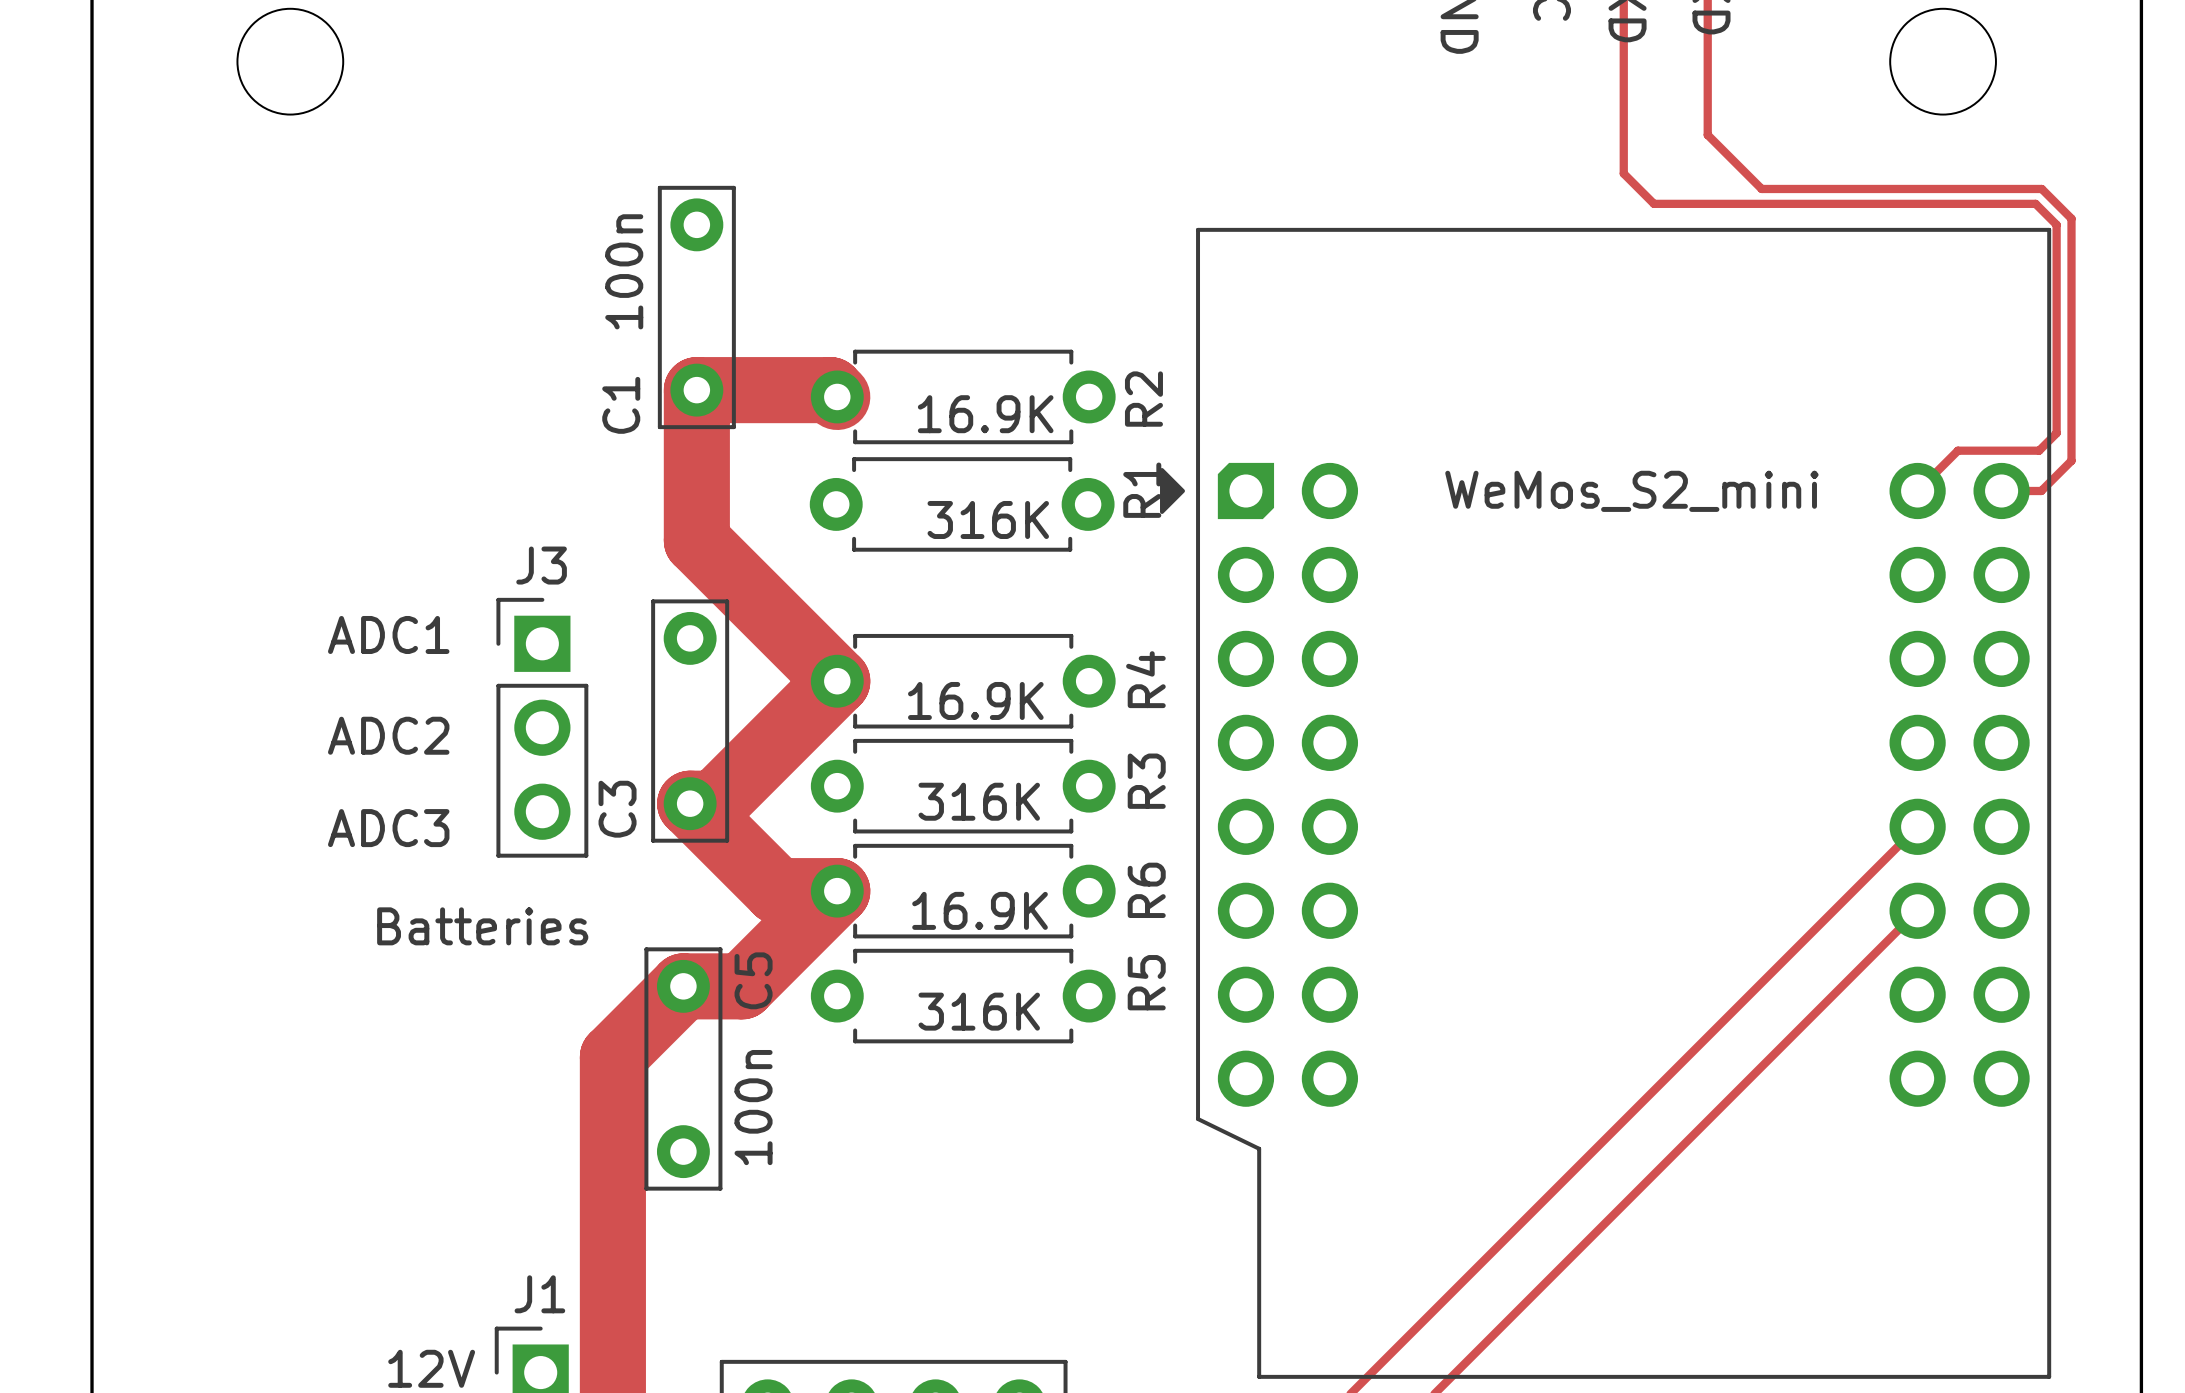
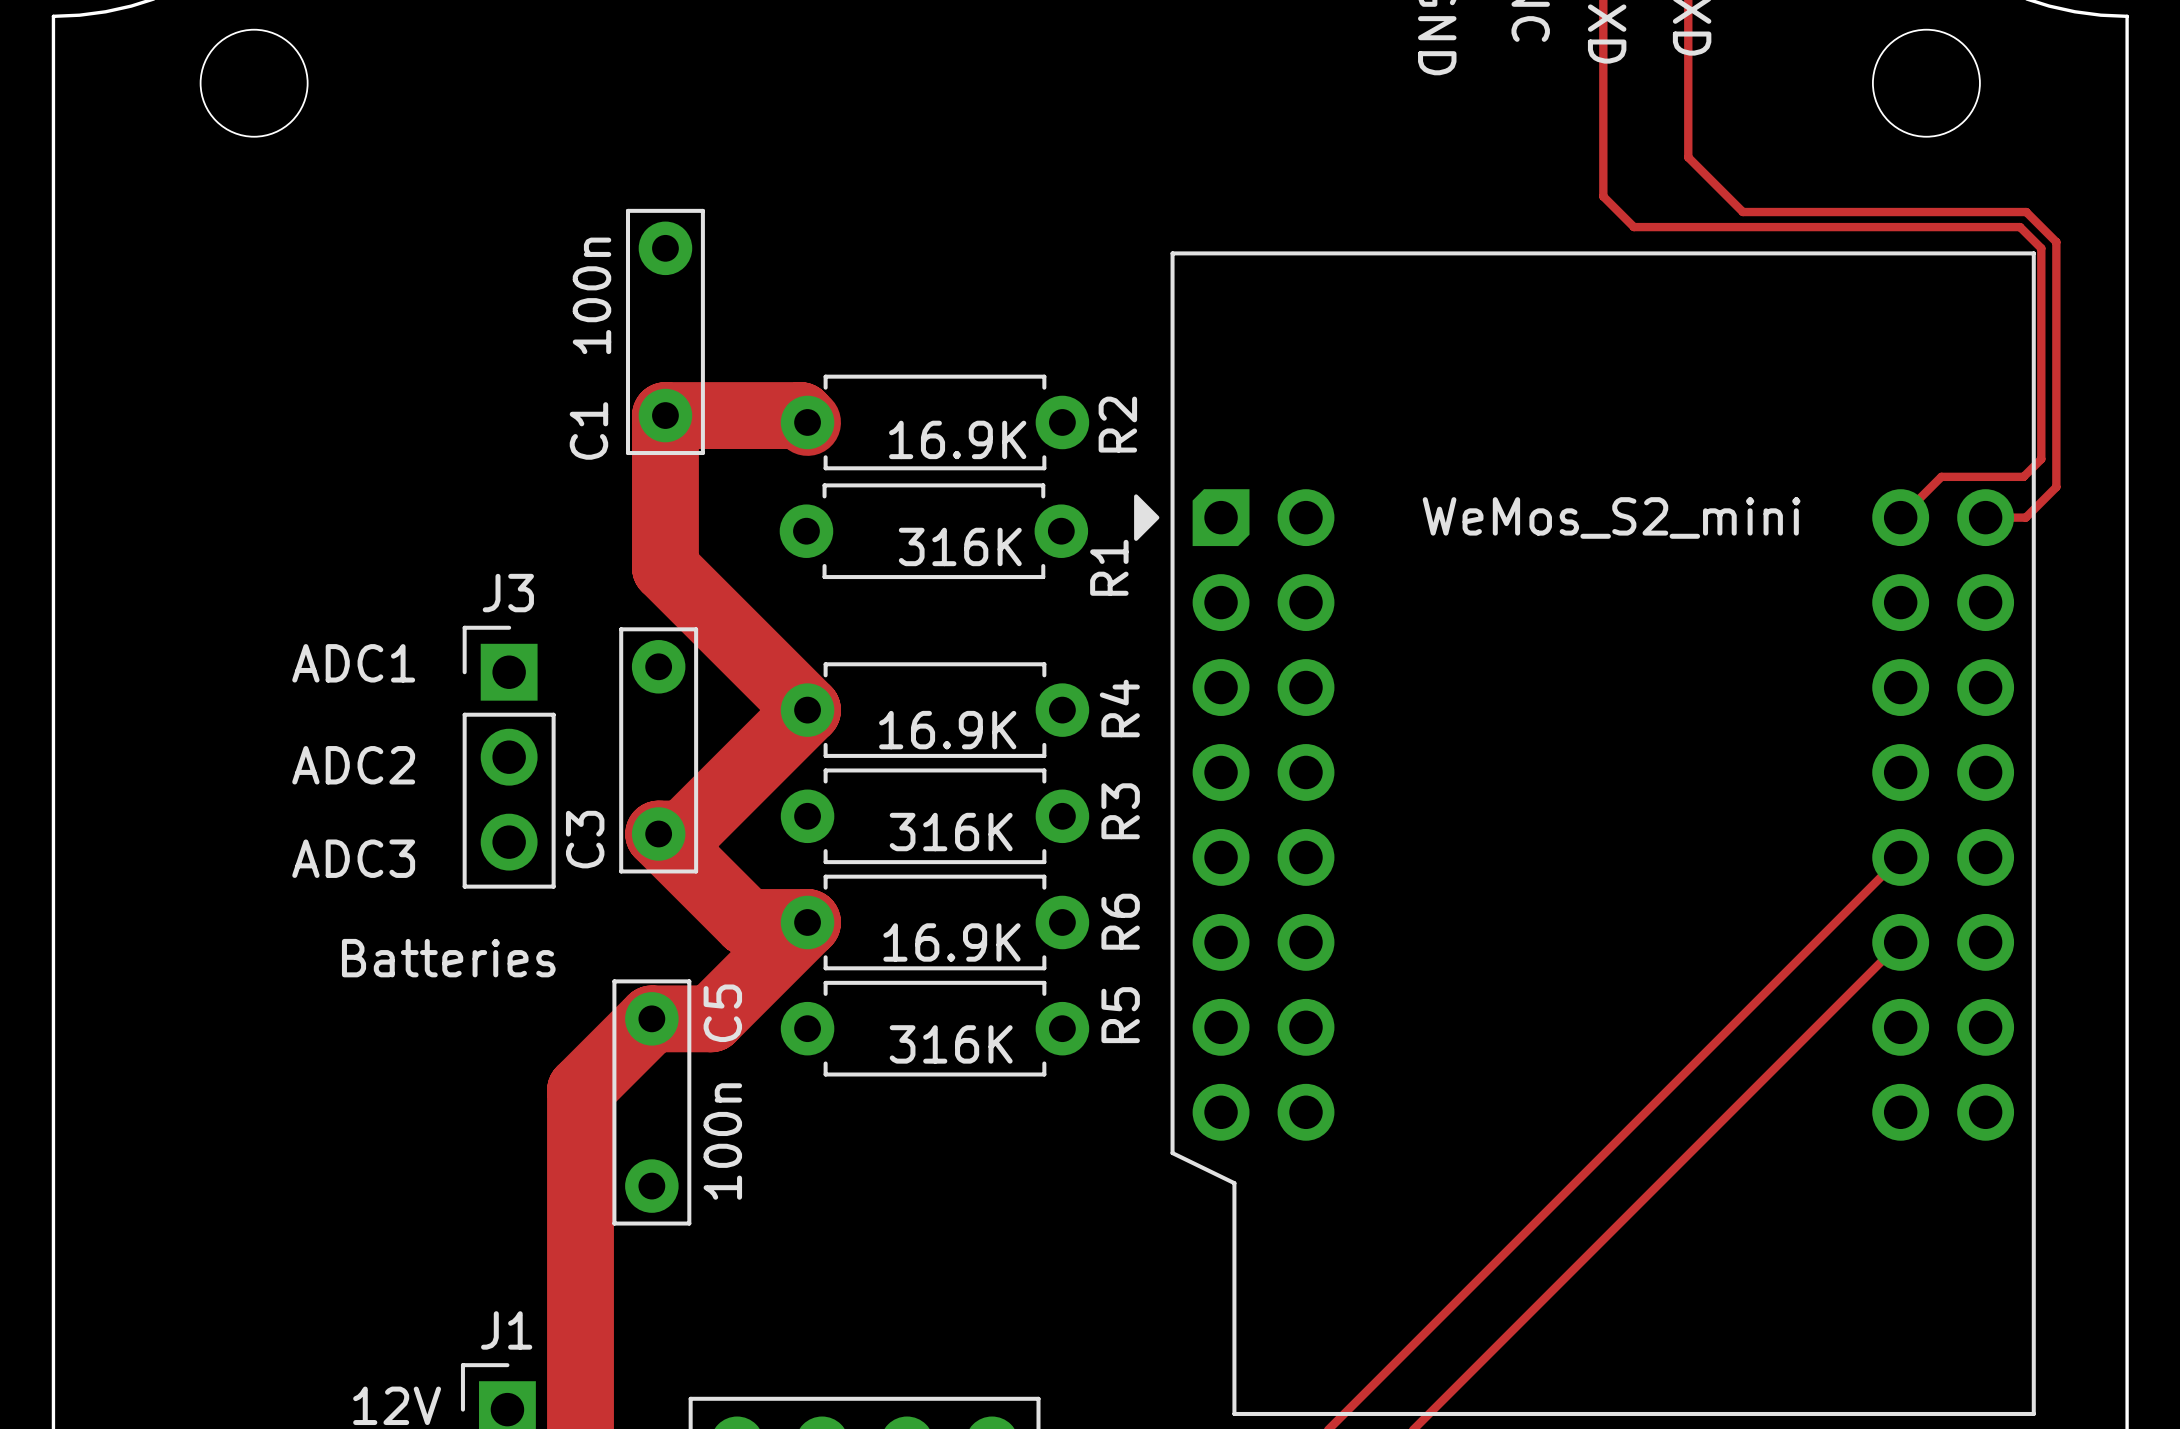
R1 name position: R1 (1142, 490) -> R1 (1109, 567)

